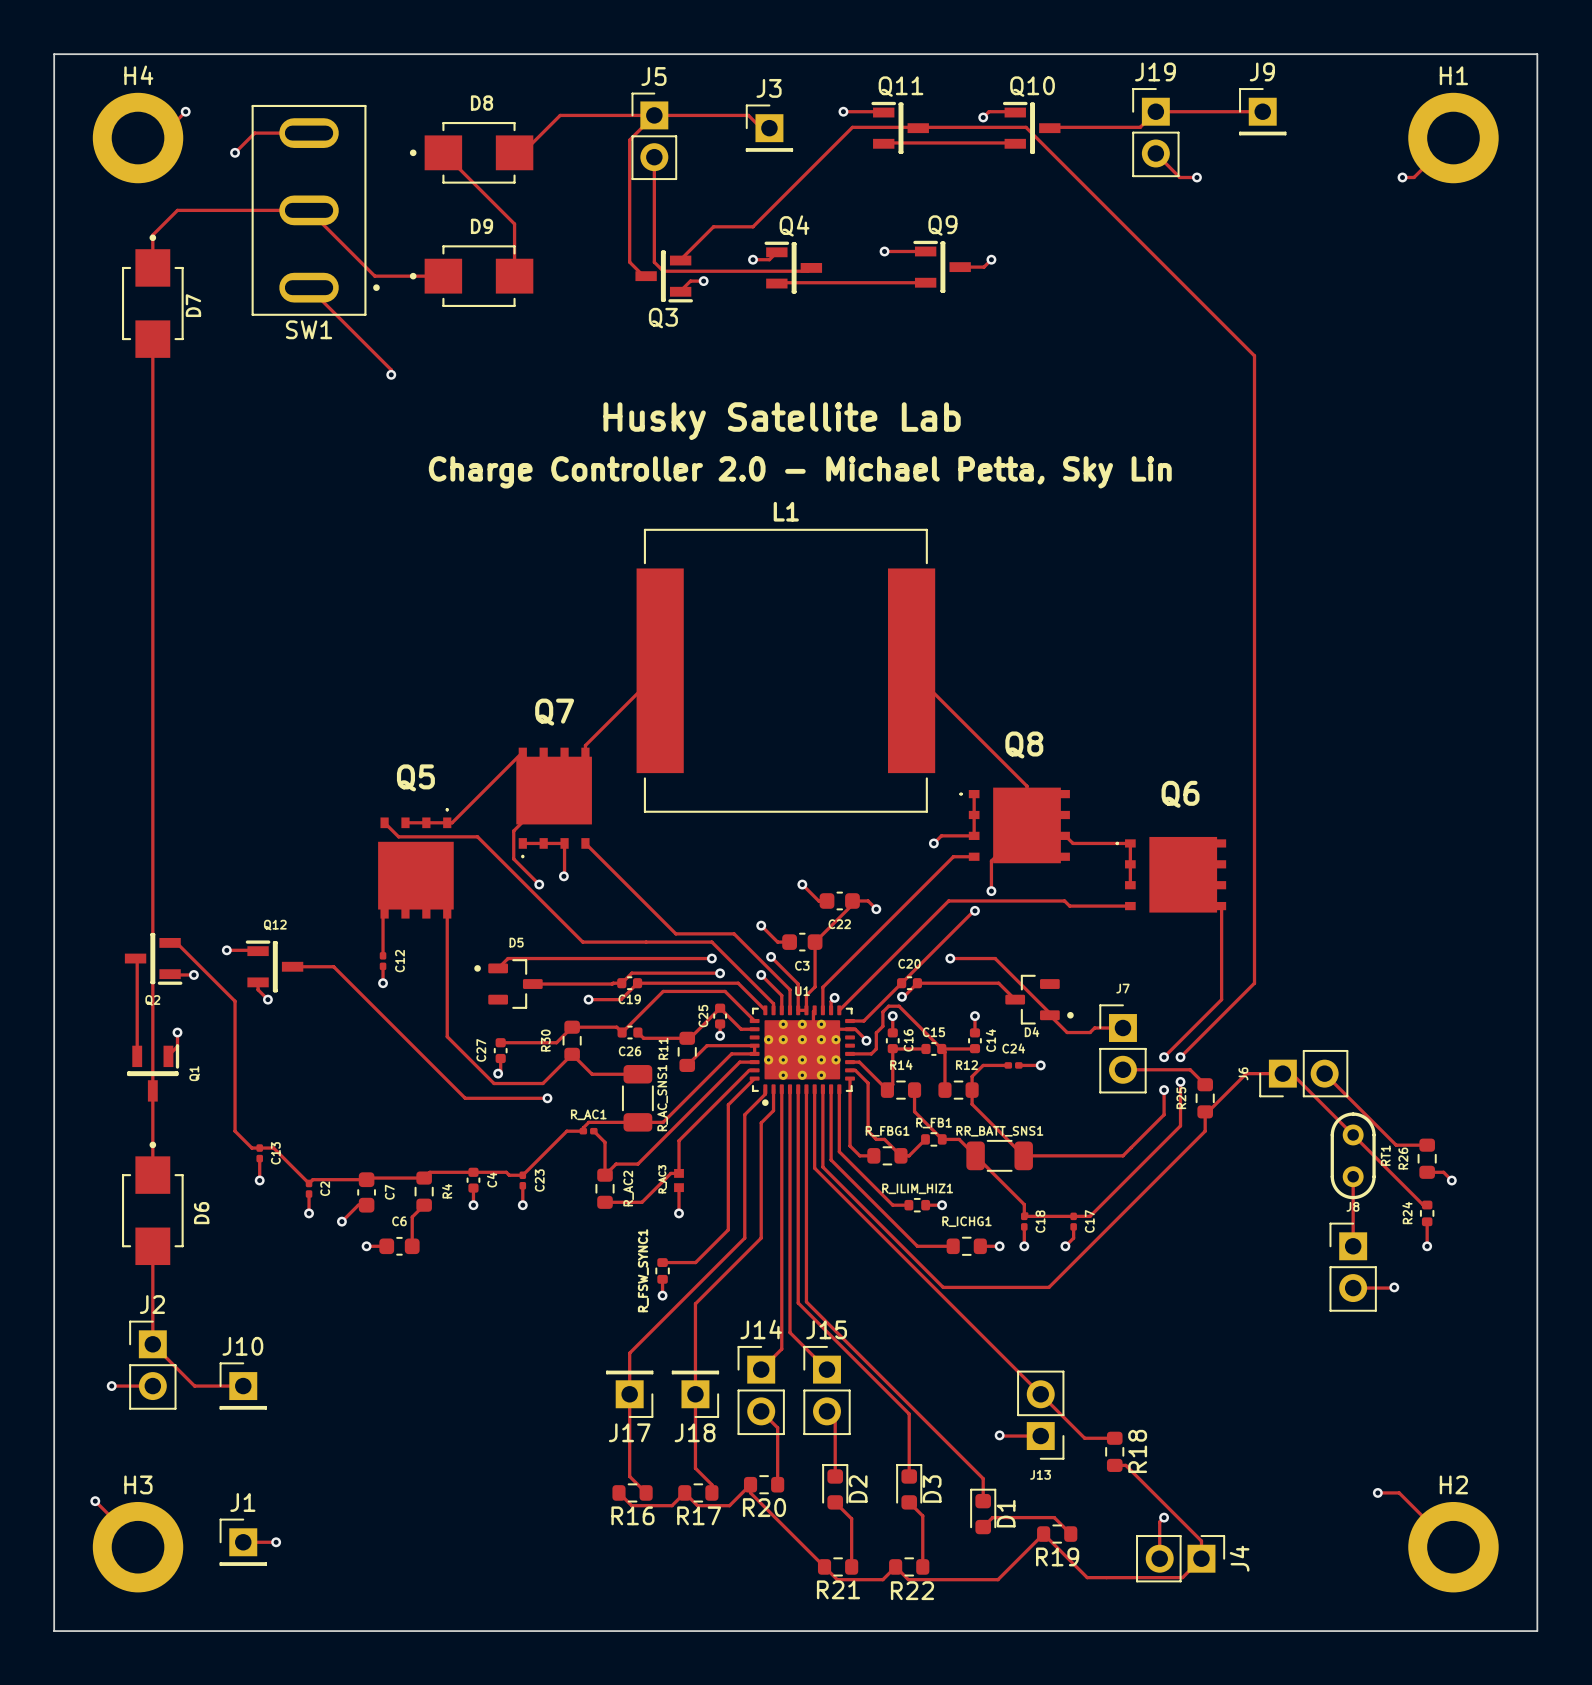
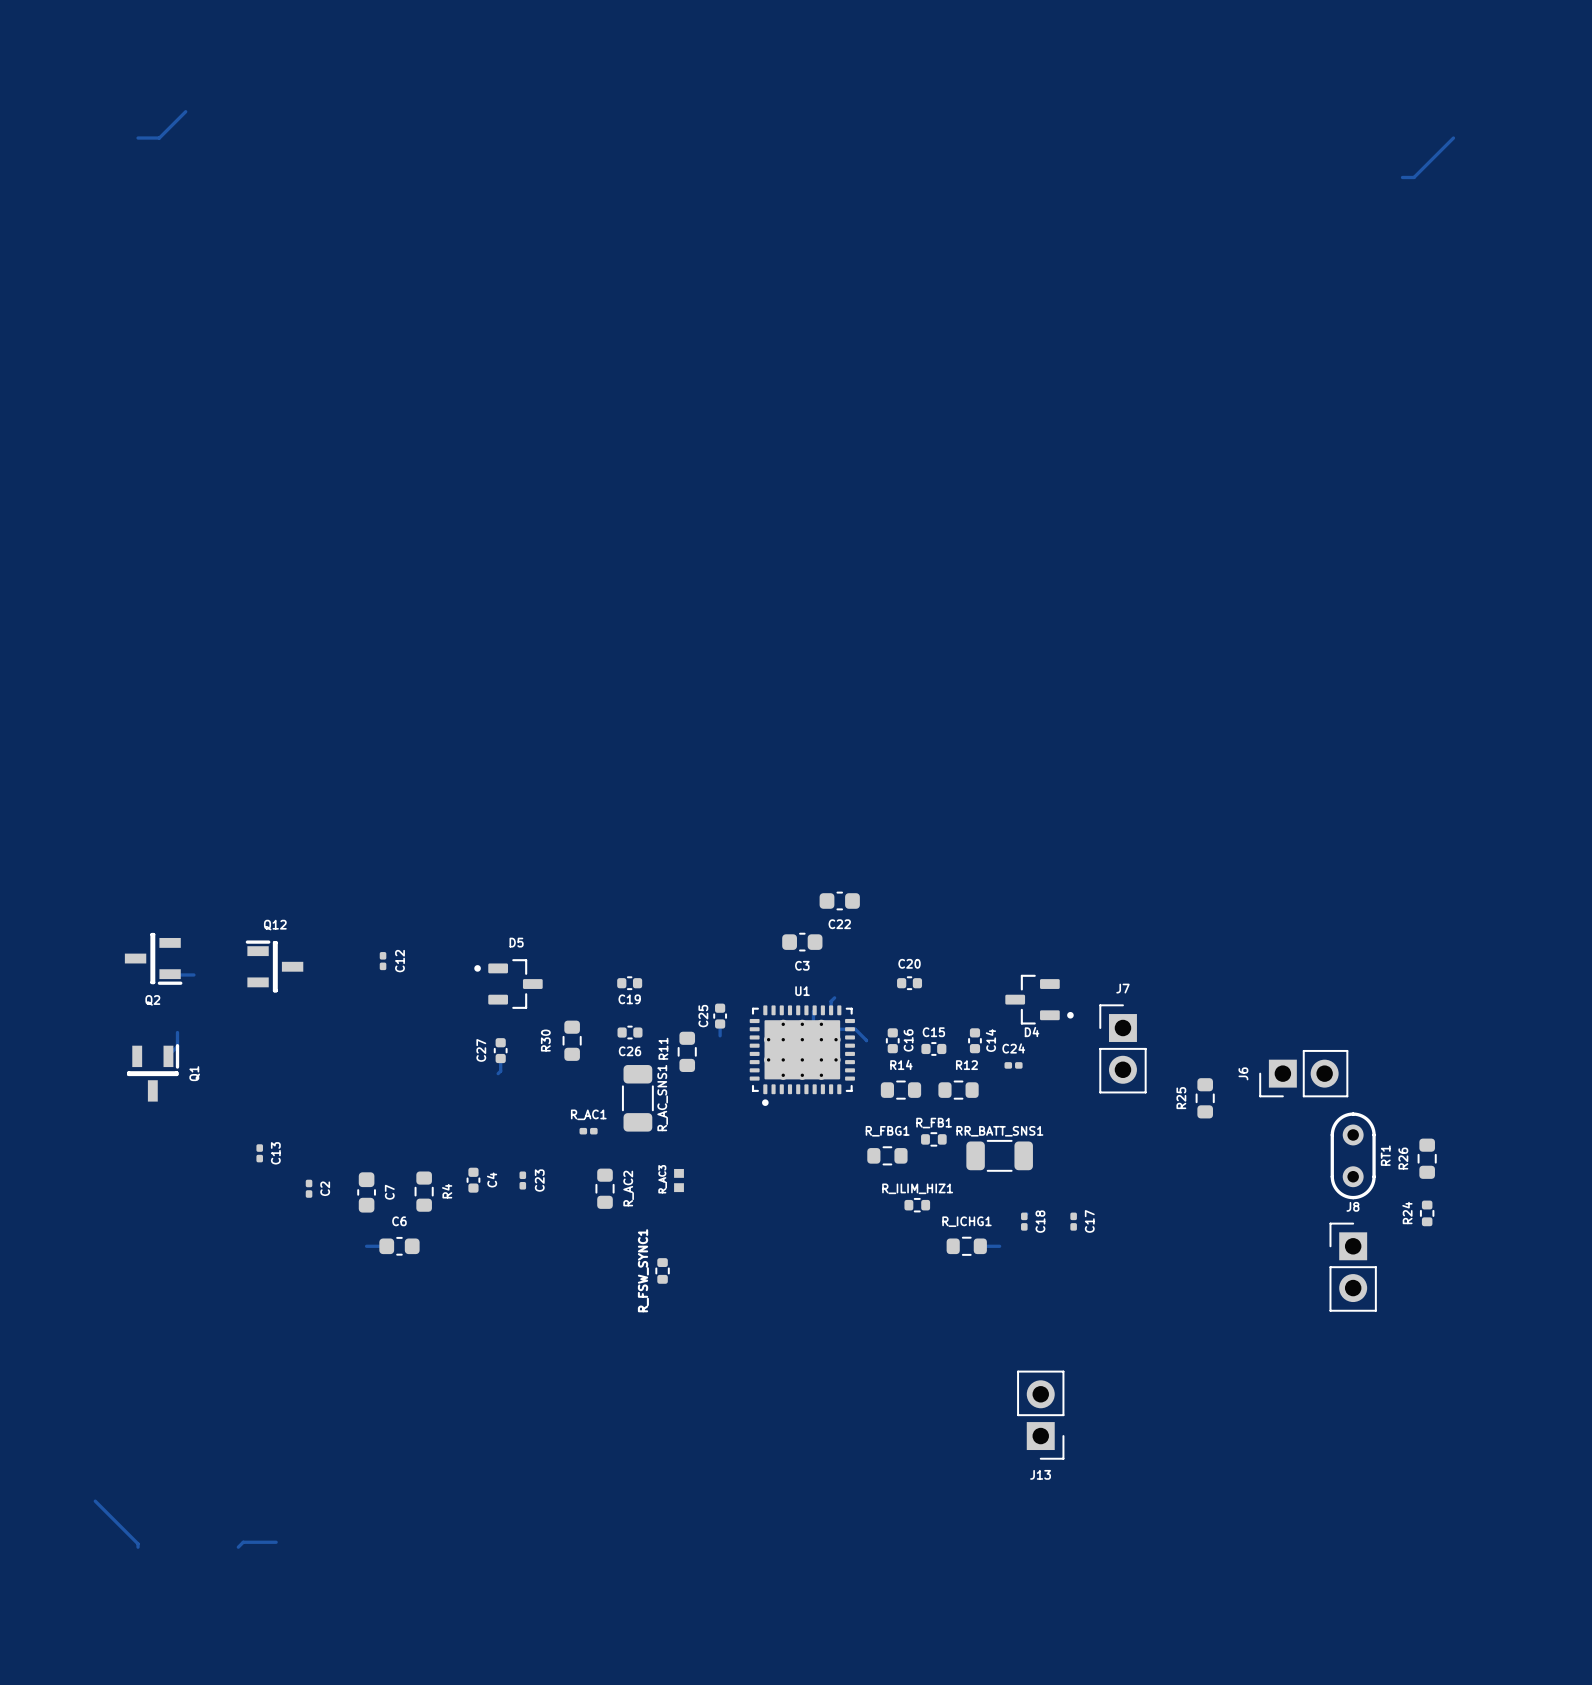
board edge: (54, 54) (54, 1631) (1537, 1631) (1537, 54) (54, 54) -> none
via: (185, 111) -> none
track: (843, 111) (884, 111) -> none
via: (843, 111) -> none
track: (1016, 111) (988, 111) (983, 117) -> none
track: (1262, 111) (1155, 111) (1140, 127) (1050, 127) -> none
J9: (1262, 111) -> none
track: (654, 115) (629, 140) (629, 262) (644, 276) -> none
via: (983, 117) -> none
Q11: (900, 127) -> none
Q10: (1031, 127) -> none
track: (769, 128) (761, 128) (748, 115) (560, 115) (522, 152) (514, 152) -> none
J3: (769, 128) -> none
J19: (1155, 132) -> none
track: (309, 133) (254, 133) (235, 152) -> none
J5: (654, 136) -> none
H4: (138, 138) -> none
H1: (1453, 138) -> none
track: (884, 142) (1016, 142) -> none
via: (235, 152) -> none
track: (443, 152) (514, 224) (514, 276) -> none
D8: (471, 152) -> none
track: (1155, 153) (1179, 177) (1196, 177) -> none
track: (654, 157) (654, 262) (663, 271) (808, 271) (812, 267) -> none
via: (1196, 177) -> none
via: (1402, 177) -> none
SW1: (315, 210) -> none
track: (777, 251) (769, 259) (753, 259) -> none
track: (884, 251) (917, 251) -> none
via: (884, 251) -> none
via: (753, 259) -> none
track: (991, 259) (984, 267) (951, 267) -> none
via: (991, 259) -> none
track: (679, 261) (713, 226) (753, 226) (852, 127) (1025, 127) (1254, 355) (1254, 983) (1180, 1057) -> none
Q9: (942, 266) -> none
track: (152, 267) (152, 235) (177, 210) (309, 210) (374, 276) (443, 276) -> none
Q4: (793, 267) -> none
D9: (471, 276) -> none
Q3: (664, 276) -> none
track: (703, 281) (690, 281) (679, 292) -> none
via: (703, 281) -> none
track: (777, 282) (917, 282) -> none
track: (309, 287) (391, 369) (391, 374) -> none
D7: (152, 296) -> none
track: (152, 339) (152, 1175) -> none
via: (391, 374) -> none
text: Husky Satellite Lab (782, 421) -> none
text: Charge Controller 2.0 - Michael Petta, Sky Lin (800, 472) -> none
track: (660, 670) (585, 745) (585, 752) -> none
L1: (785, 670) -> none
track: (911, 681) (911, 670) (1027, 786) (1027, 825) (991, 861) (991, 891) -> none
track: (522, 752) (452, 822) (405, 822) -> none
track: (554, 790) (513, 830) (513, 859) (539, 884) -> none
track: (974, 794) (974, 835) (941, 835) (933, 843) -> none
Q7: (554, 802) -> none
track: (384, 822) (398, 836) (477, 836) (582, 942) (711, 942) (773, 1003) (773, 1010) -> none
Q8: (1014, 825) -> none
track: (1065, 835) (1072, 843) (1130, 843) (1130, 885) -> none
track: (522, 843) (564, 843) (563, 876) -> none
track: (585, 843) (675, 933) (734, 933) (790, 989) (790, 1010) -> none
via: (933, 843) -> none
track: (974, 856) (953, 856) (822, 987) (822, 1010) -> none
Q5: (415, 863) -> none
Q6: (1170, 874) -> none
via: (563, 876) -> none
via: (539, 884) -> none
track: (802, 884) (818, 900) (826, 900) -> none
via: (802, 884) -> none
via: (991, 891) -> none
track: (1130, 906) (1069, 906) (1064, 900) (948, 900) (839, 1010) -> none
track: (1221, 906) (1221, 999) (1164, 1057) -> none
track: (876, 909) (868, 900) (852, 900) (852, 904) (815, 942) (815, 986) (806, 995) (806, 1010) (798, 1010) (798, 984) (771, 956) -> none
via: (876, 909) -> none
track: (974, 910) (863, 1021) (850, 1021) -> none
via: (974, 910) -> none
track: (384, 914) (383, 915) (383, 955) -> none
track: (447, 914) (447, 1036) (494, 1083) (542, 1083) (572, 1054) -> none
track: (761, 925) (777, 942) (789, 942) -> none
via: (761, 925) -> none
track: (170, 942) (176, 942) (235, 1001) (235, 1131) (251, 1148) (273, 1148) (309, 1183) (312, 1179) (424, 1178) (419, 1173) -> none
track: (226, 950) (258, 951) -> none
via: (226, 950) -> none
via: (771, 956) -> none
track: (136, 958) (137, 1055) -> none
track: (711, 958) (508, 958) (498, 968) -> none
via: (711, 958) -> none
track: (950, 958) (995, 958) (1067, 1032) (1090, 1032) (1094, 1028) (1122, 1028) -> none
via: (950, 958) -> none
track: (292, 966) (333, 966) (465, 1098) (547, 1098) -> none
track: (383, 966) (383, 983) -> none
track: (719, 973) (631, 973) (621, 983) (532, 984) -> none
via: (720, 973) -> none
via: (193, 974) -> none
track: (761, 974) (781, 995) (781, 1010) -> none
via: (761, 974) -> none
track: (258, 982) (258, 989) (267, 999) -> none
via: (383, 983) -> none
track: (901, 996) (917, 983) (998, 983) (1015, 999) -> none
via: (901, 996) -> none
via: (834, 997) -> none
via: (267, 999) -> none
track: (588, 999) (621, 999) (637, 983) (738, 983) (765, 1010) -> none
via: (588, 999) -> none
track: (892, 1016) (892, 1032) -> none
via: (892, 1016) -> none
track: (974, 1016) (974, 1032) -> none
via: (974, 1016) -> none
track: (754, 1021) (725, 991) (663, 991) (622, 1032) (616, 1027) (572, 1027) (556, 1042) (500, 1042) -> none
track: (754, 1029) (741, 1029) (720, 1008) (690, 1038) (643, 1038) (637, 1032) -> none
via: (177, 1032) -> none
via: (720, 1035) -> none
via: (866, 1040) -> none
track: (925, 1048) (892, 1048) (892, 1084) (887, 1090) (859, 1062) (850, 1062) -> none
track: (974, 1048) (941, 1048) -> none
track: (850, 1053) (871, 1053) (876, 1048) (876, 1032) (882, 1026) (882, 1011) (888, 1006) (899, 1006) (944, 1052) (944, 1090) -> none
track: (572, 1054) (592, 1074) (637, 1074) -> none
via: (1164, 1057) -> none
via: (1180, 1057) -> none
track: (754, 1062) (739, 1062) (637, 1164) (616, 1164) (605, 1175) (605, 1142) (593, 1131) -> none
track: (687, 1065) (706, 1045) (754, 1045) (754, 1053) (731, 1053) (663, 1122) (588, 1122) (583, 1127) (583, 1131) (566, 1131) (522, 1175) (509, 1175) (506, 1172) (429, 1172) (422, 1179) -> none
track: (1008, 1065) (983, 1065) (972, 1076) (972, 1104) (1023, 1155) (1122, 1155) (1164, 1114) (1164, 1090) -> none
track: (1018, 1065) (1040, 1065) -> none
via: (1040, 1065) -> none
track: (1122, 1069) (1190, 1069) (1205, 1084) -> none
track: (754, 1070) (749, 1070) (679, 1140) (679, 1173) (670, 1173) (642, 1202) (605, 1202) -> none
track: (850, 1070) (855, 1070) (868, 1083) (868, 1131) (876, 1139) (884, 1139) (900, 1155) (909, 1155) (925, 1139) -> none
via: (498, 1073) -> none
track: (1324, 1073) (1396, 1145) (1427, 1145) -> none
track: (754, 1078) (728, 1104) (728, 1229) (695, 1262) (662, 1262) -> none
track: (850, 1078) (850, 1145) (859, 1155) (873, 1155) -> none
track: (1180, 1081) (1180, 1125) (1090, 1216) (1024, 1216) (1024, 1204) (959, 1139) (942, 1139) (914, 1111) (914, 1090) -> none
via: (1180, 1081) -> none
track: (765, 1089) (765, 1094) (744, 1114) (744, 1238) (629, 1353) (629, 1476) (646, 1492) -> none
track: (773, 1089) (773, 1110) (761, 1122) (761, 1238) (695, 1303) (695, 1468) (711, 1484) (711, 1492) -> none
track: (781, 1089) (781, 1349) (761, 1369) -> none
track: (790, 1089) (790, 1332) (826, 1369) -> none
track: (798, 1089) (798, 1302) (909, 1413) (909, 1476) -> none
track: (806, 1089) (806, 1301) (983, 1478) (983, 1501) -> none
track: (814, 1089) (814, 1168) (1084, 1438) (1114, 1438) -> none
track: (822, 1089) (822, 1167) (943, 1287) (1048, 1287) (1205, 1131) (1205, 1111) (1208, 1111) (1246, 1073) (1291, 1073) (1423, 1205) (1427, 1205) -> none
track: (831, 1089) (831, 1159) (917, 1246) (953, 1246) -> none
track: (839, 1089) (839, 1151) (892, 1205) (908, 1205) -> none
via: (1164, 1090) -> none
via: (547, 1098) -> none
track: (259, 1158) (259, 1180) -> none
track: (1427, 1172) (1443, 1172) (1451, 1180) -> none
track: (1353, 1176) (1353, 1246) -> none
via: (259, 1180) -> none
via: (1451, 1180) -> none
track: (522, 1185) (522, 1205) -> none
track: (679, 1187) (679, 1213) -> none
track: (473, 1188) (473, 1205) -> none
track: (309, 1194) (309, 1213) -> none
D6: (152, 1203) -> none
track: (366, 1205) (358, 1205) (341, 1221) -> none
track: (424, 1205) (412, 1217) (412, 1246) -> none
via: (473, 1205) -> none
via: (522, 1205) -> none
track: (925, 1205) (942, 1205) -> none
via: (942, 1205) -> none
via: (309, 1213) -> none
via: (679, 1213) -> none
via: (341, 1221) -> none
track: (1427, 1221) (1427, 1246) -> none
track: (1024, 1226) (1024, 1246) -> none
track: (1073, 1226) (1073, 1238) (1065, 1246) -> none
track: (152, 1246) (152, 1344) (194, 1386) (243, 1386) -> none
via: (366, 1246) -> none
via: (999, 1246) -> none
via: (1024, 1246) -> none
via: (1065, 1246) -> none
via: (1427, 1246) -> none
track: (662, 1279) (662, 1295) -> none
track: (1394, 1287) (1353, 1288) -> none
via: (1394, 1287) -> none
via: (662, 1295) -> none
J2: (152, 1365) -> none
track: (111, 1386) (152, 1386) -> none
via: (111, 1386) -> none
J10: (243, 1386) -> none
J14: (761, 1390) -> none
J15: (826, 1390) -> none
J17: (629, 1394) -> none
J18: (695, 1394) -> none
track: (761, 1411) (777, 1427) (777, 1484) -> none
track: (826, 1411) (835, 1419) (835, 1476) -> none
track: (999, 1435) (1040, 1436) (1040, 1439) -> none
via: (999, 1435) -> none
R18: (1114, 1451) -> none
track: (1114, 1465) (1125, 1465) (1201, 1541) (1201, 1558) (1182, 1577) (1087, 1577) (1043, 1534) (997, 1579) (908, 1579) (895, 1566) (882, 1579) (837, 1579) (750, 1492) (750, 1484) (729, 1505) (697, 1505) (684, 1492) (672, 1505) (631, 1505) (618, 1492) -> none
R20: (764, 1484) -> none
D2: (835, 1486) -> none
D3: (909, 1486) -> none
R16: (632, 1492) -> none
R17: (698, 1492) -> none
track: (1377, 1492) (1399, 1492) (1453, 1547) -> none
via: (1377, 1492) -> none
via: (95, 1501) -> none
track: (835, 1502) (851, 1518) (851, 1566) -> none
track: (909, 1502) (922, 1515) (922, 1566) -> none
D1: (983, 1511) -> none
track: (1164, 1517) (1159, 1521) (1159, 1558) -> none
via: (1164, 1517) -> none
track: (983, 1527) (992, 1517) (1054, 1517) (1070, 1534) -> none
R19: (1057, 1534) -> none
J1: (243, 1542) -> none
via: (276, 1542) -> none
H3: (138, 1547) -> none
H2: (1453, 1547) -> none
J4: (1180, 1558) -> none
R21: (838, 1566) -> none
R22: (909, 1566) -> none

